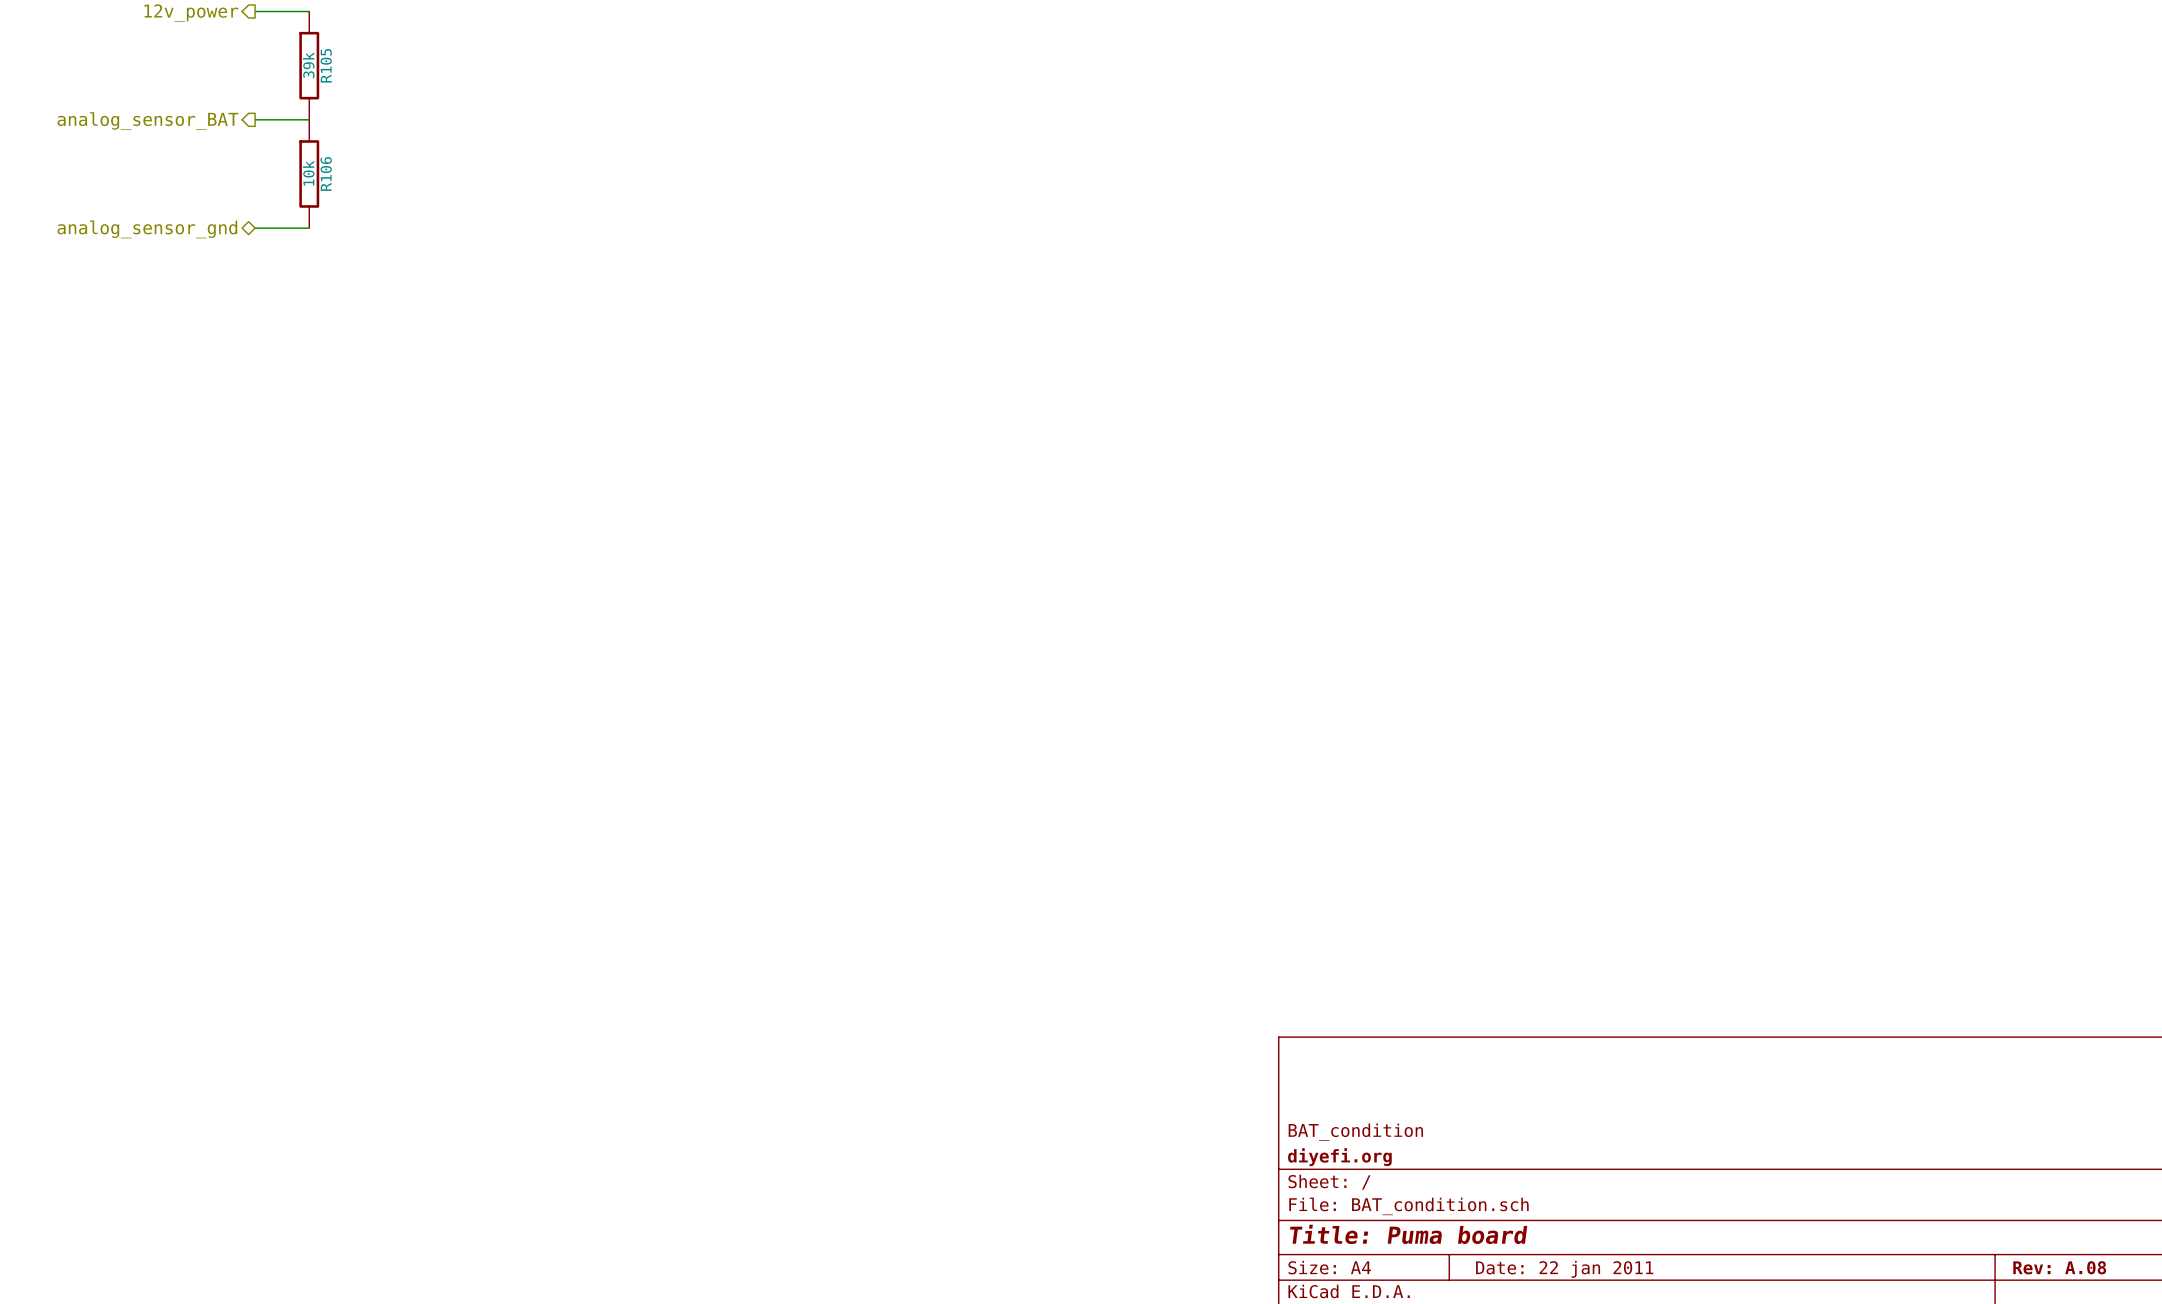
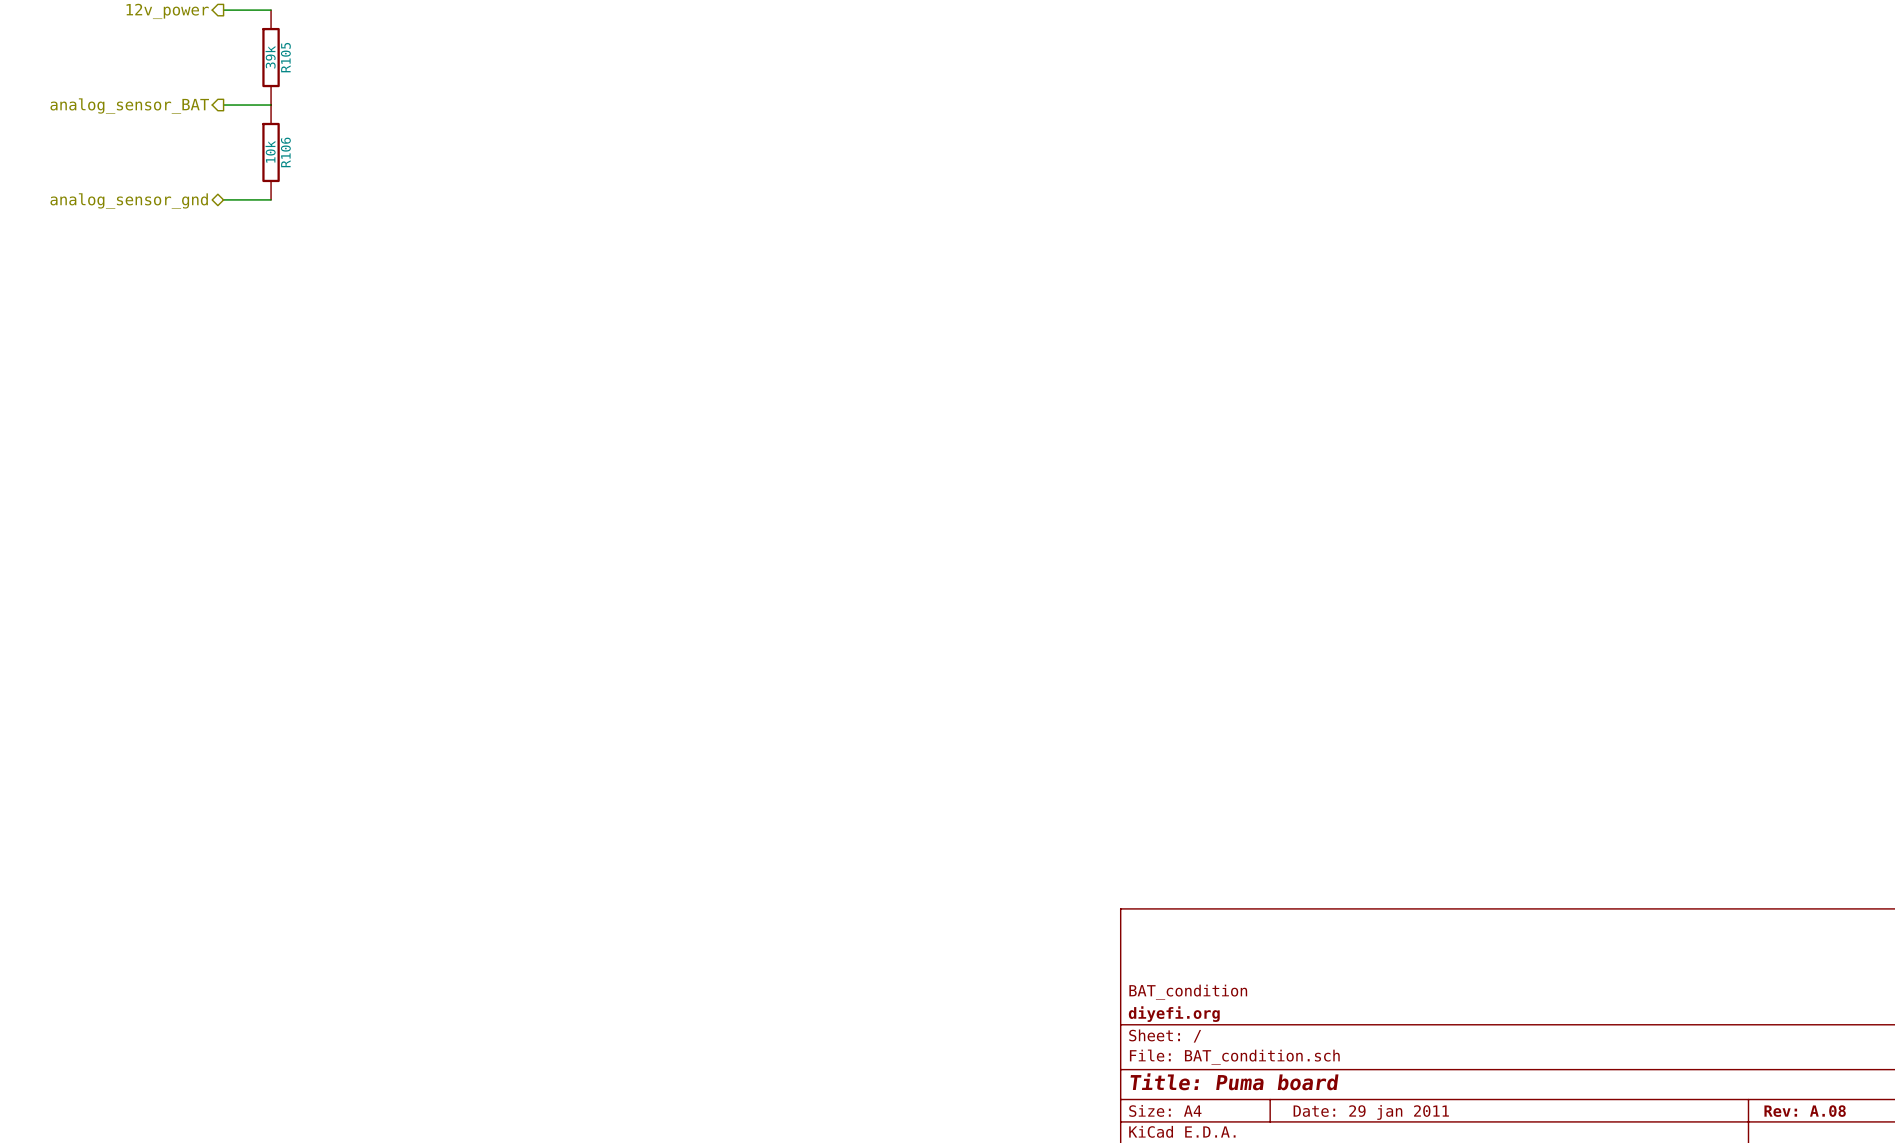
title block: Date: 22 jan 2011 (1564, 1269) -> Date: 29 jan 2011 (1371, 1112)

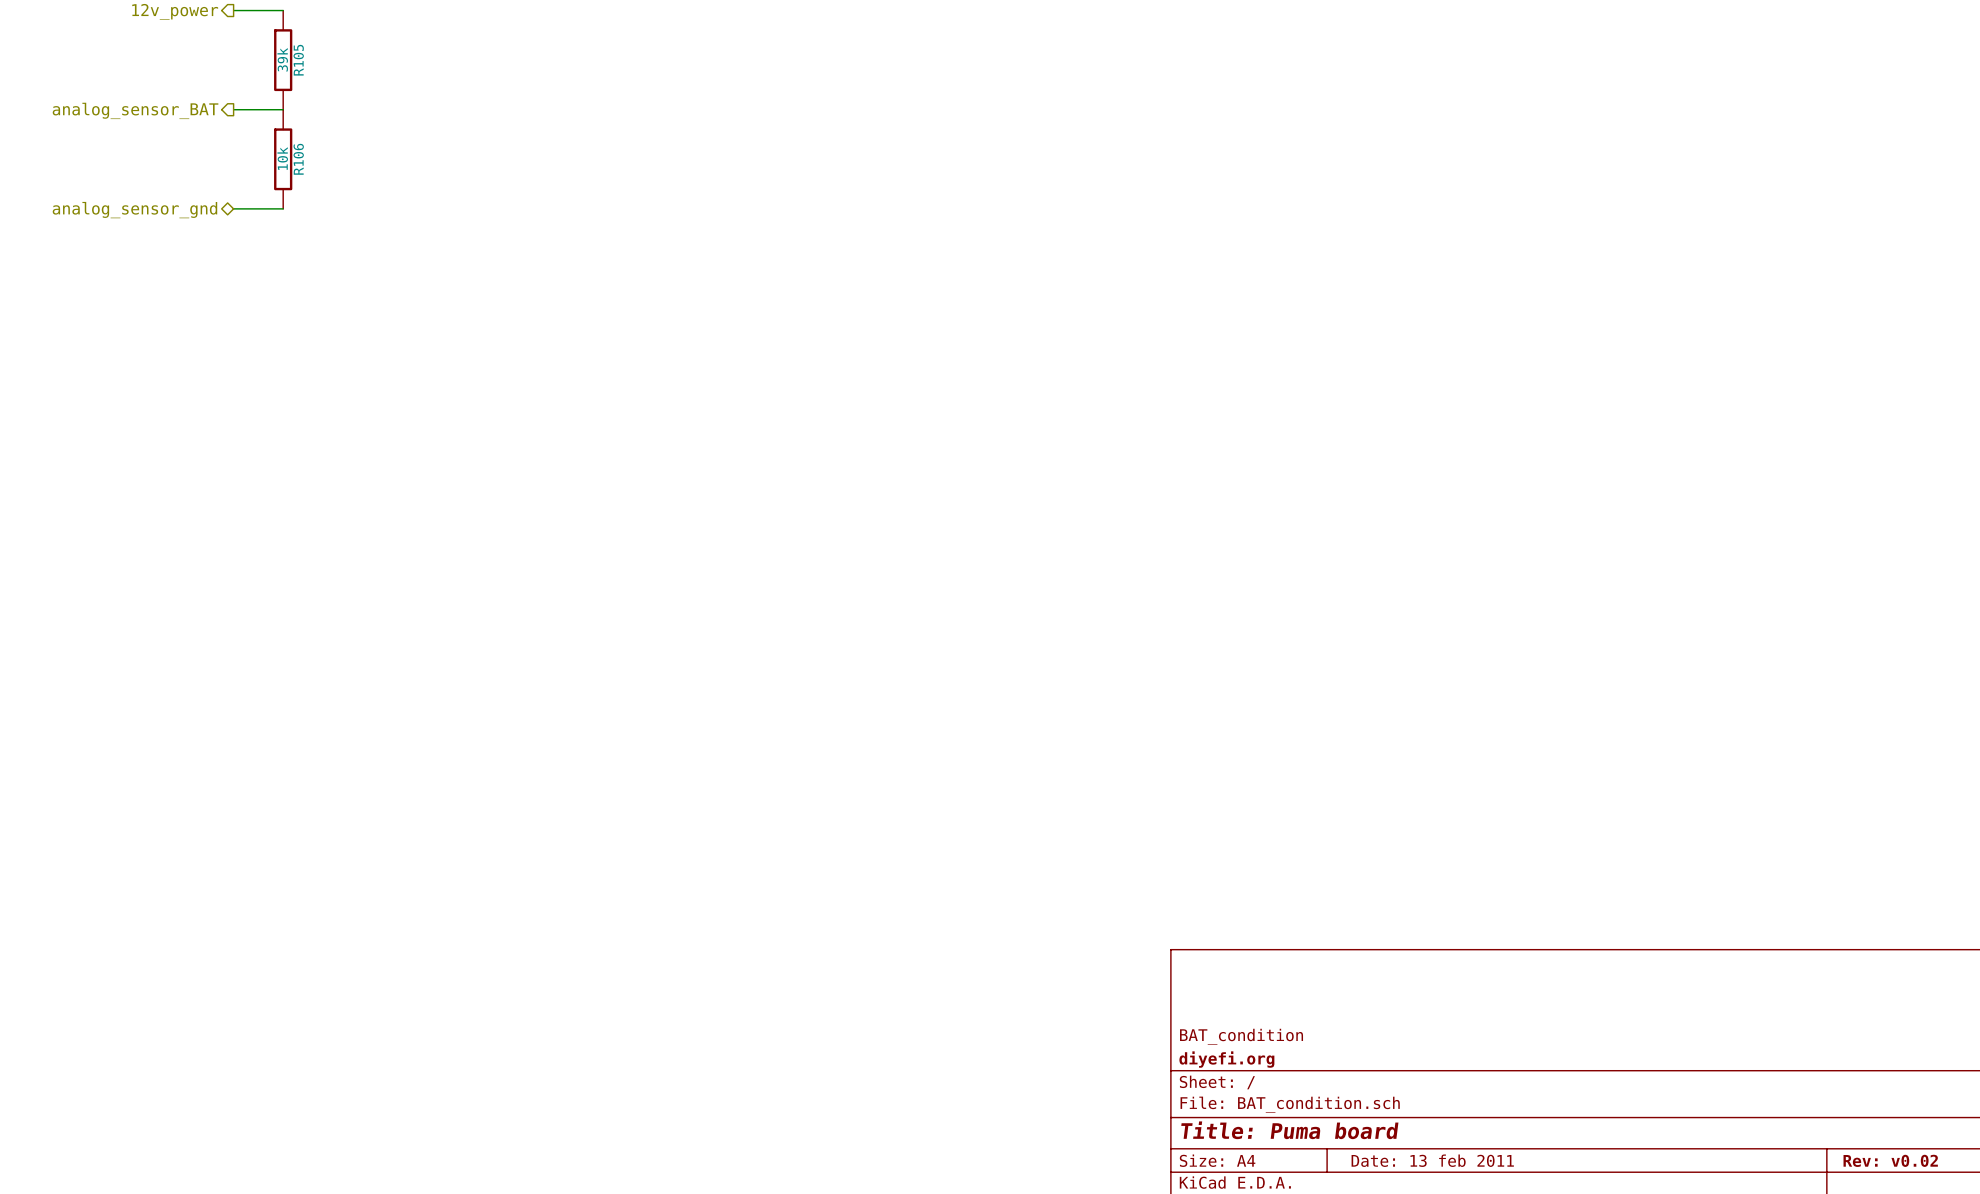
title block: Rev: A.08 (1805, 1111) -> Rev: v0.02 (1890, 1160)
title block: Date: 29 jan 2011 (1371, 1112) -> Date: 13 feb 2011 (1432, 1160)

